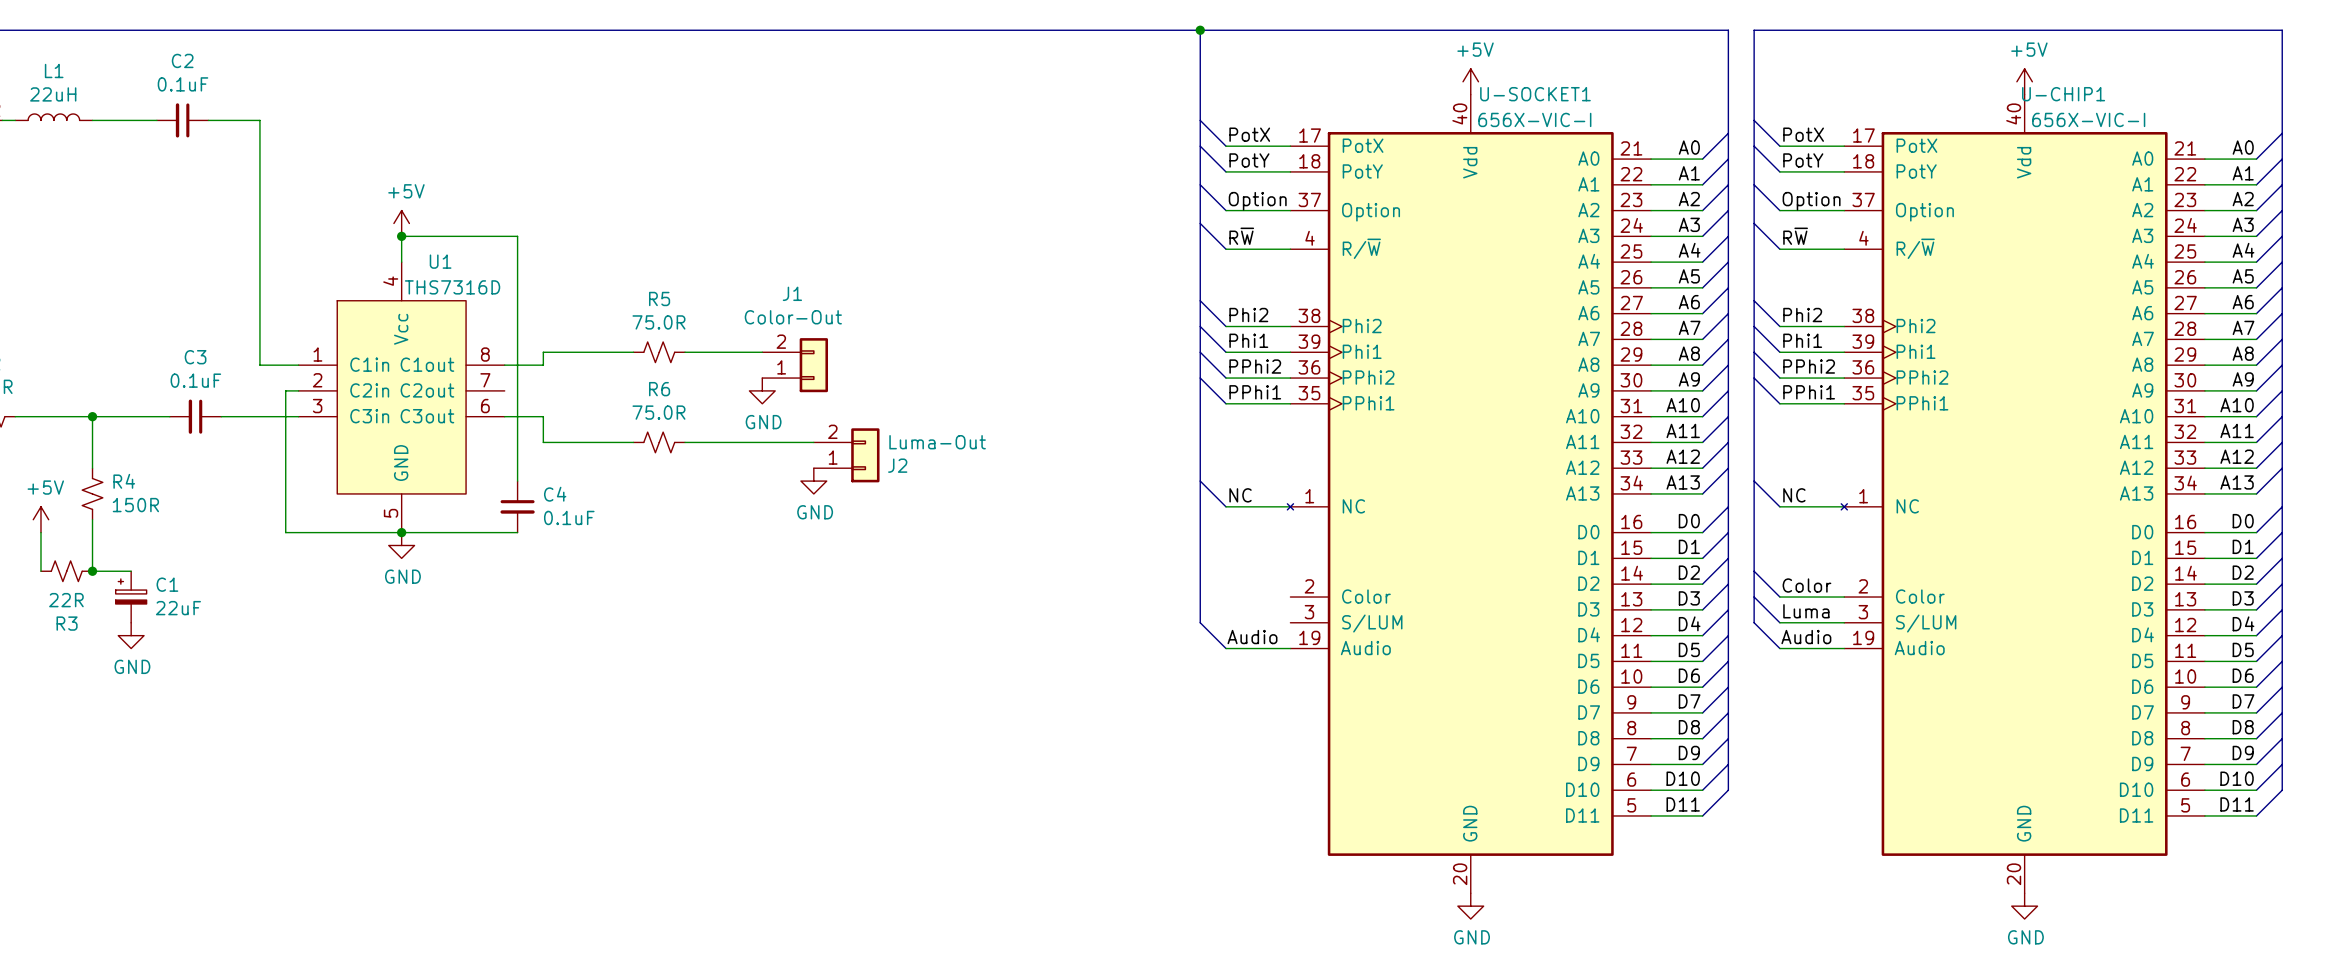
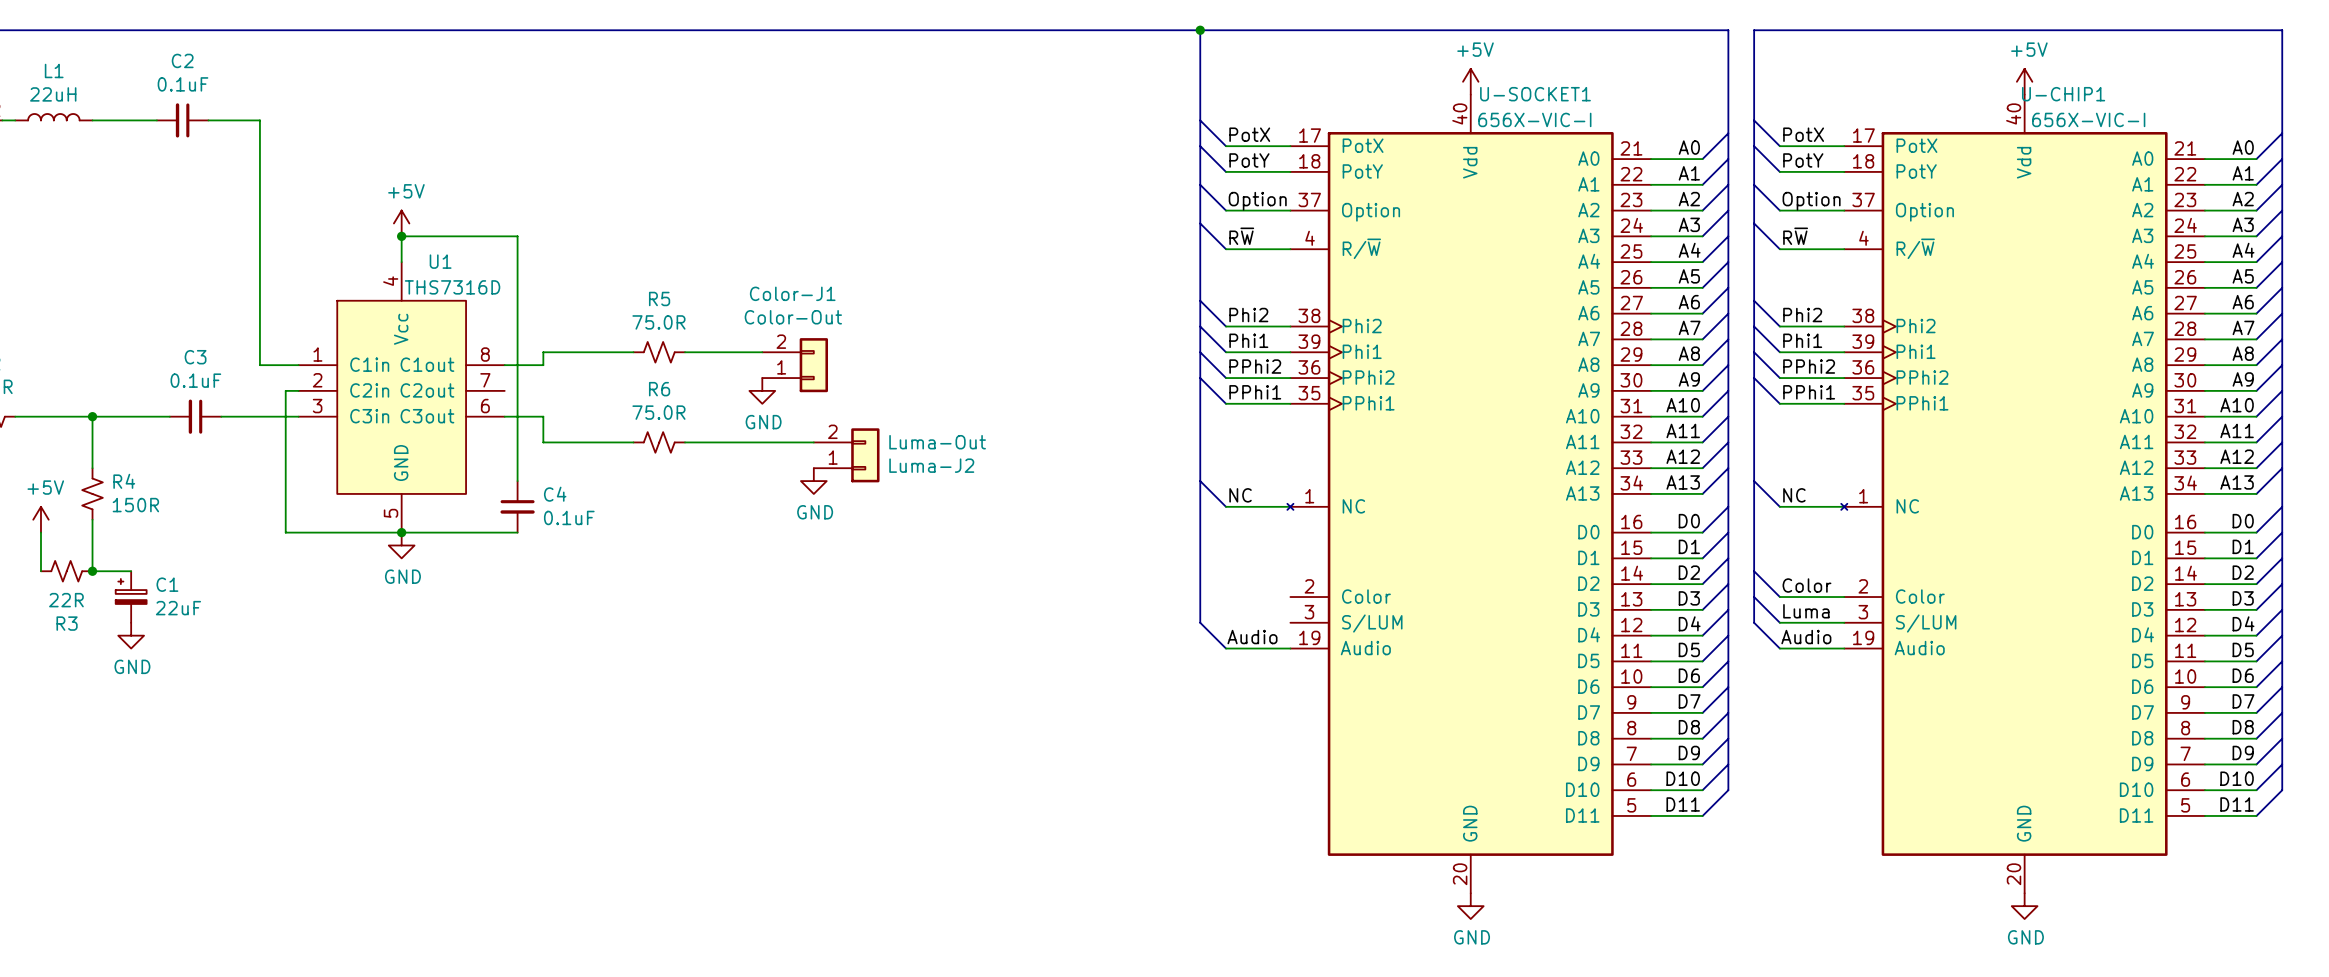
J1 name: J1 (792, 293) -> Color-J1 (792, 293)
J2 name: J2 (897, 465) -> Luma-J2 (931, 465)

